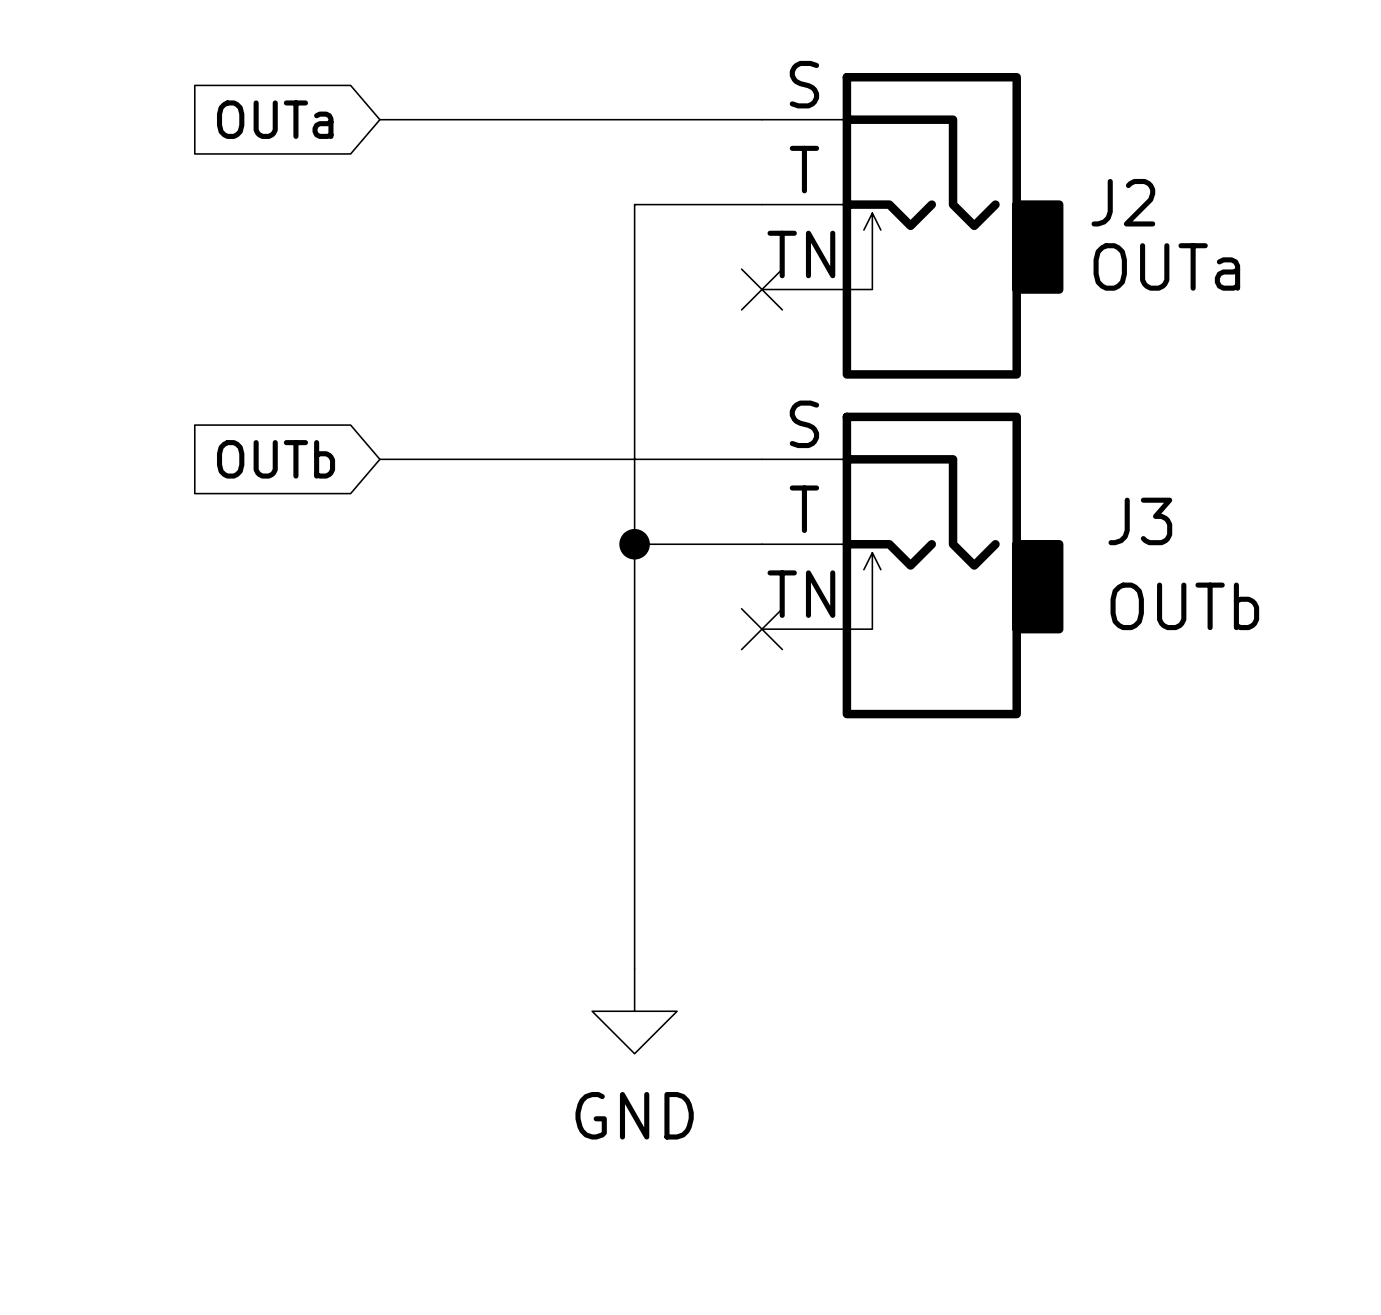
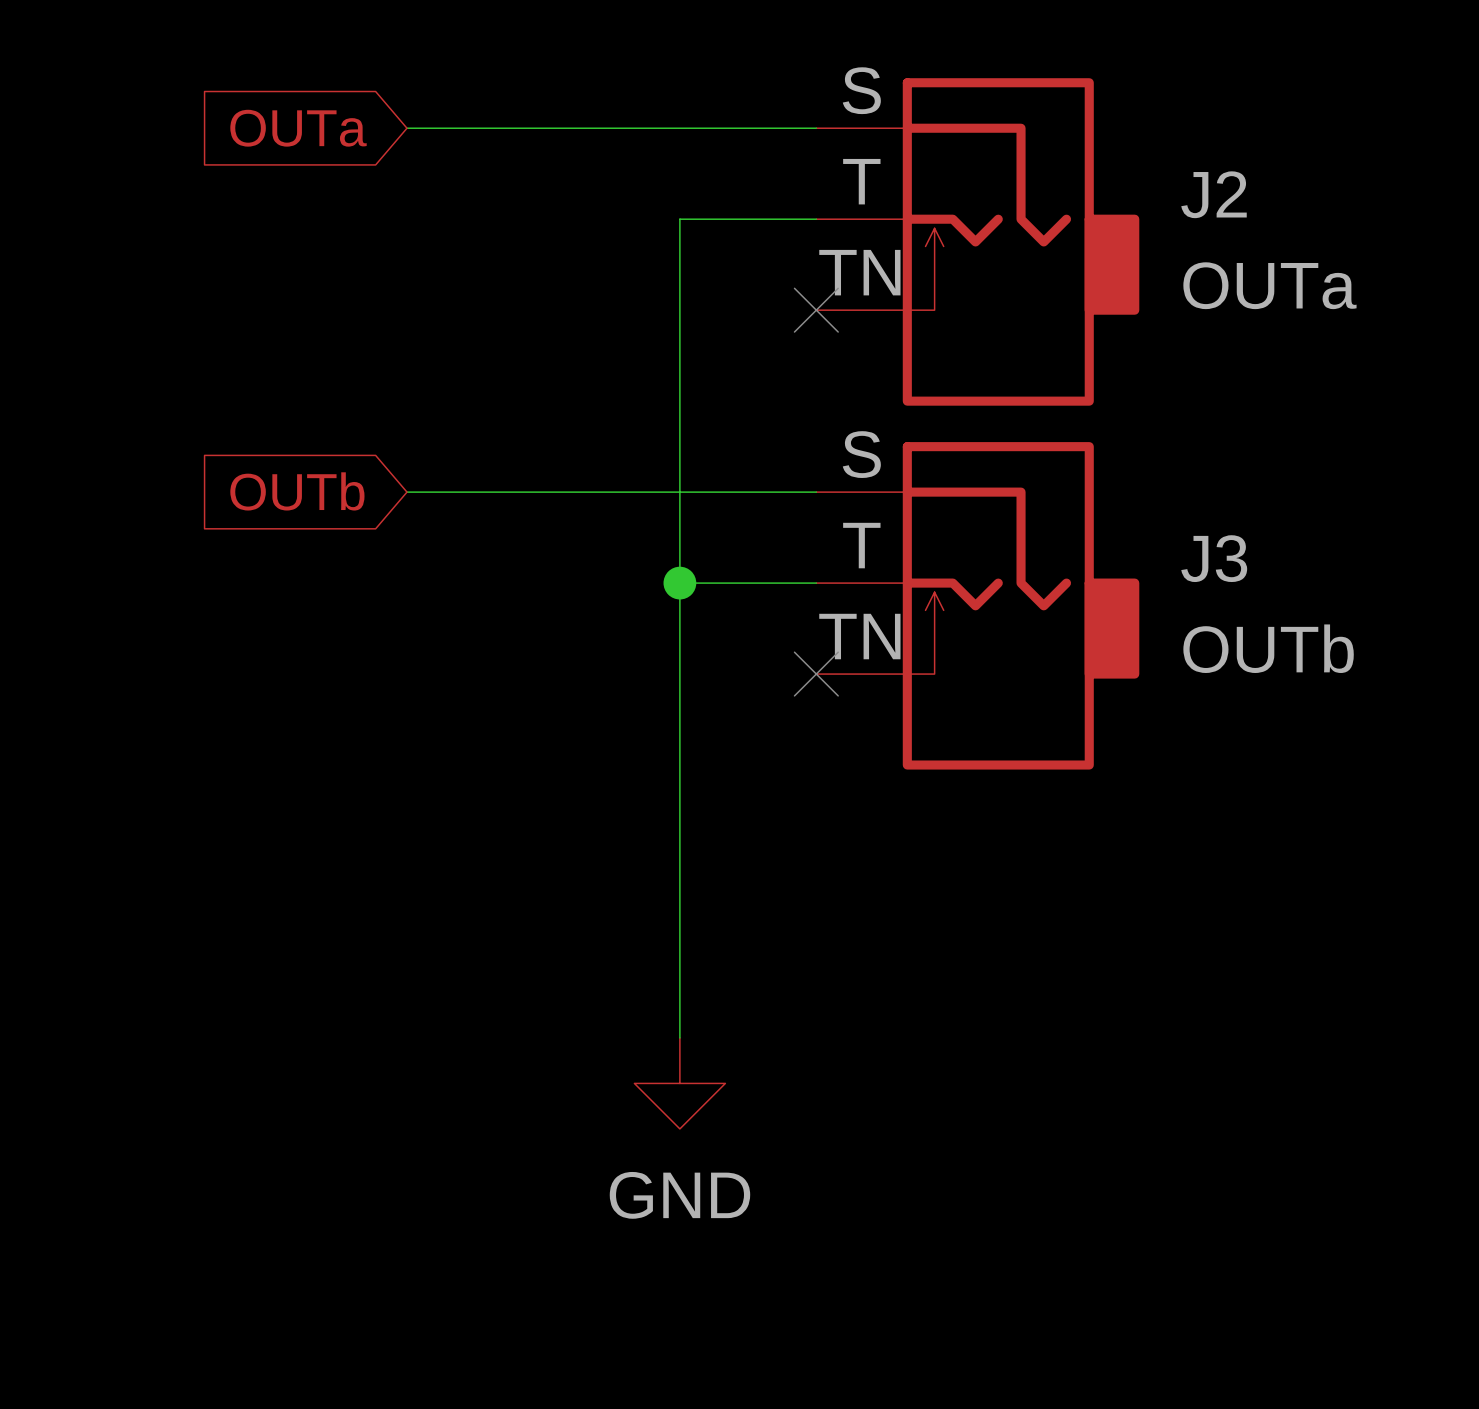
J2 name position: J2 (1123, 202) -> J2 (1214, 194)
J2 value position: OUTa (1166, 266) -> OUTa (1269, 285)

